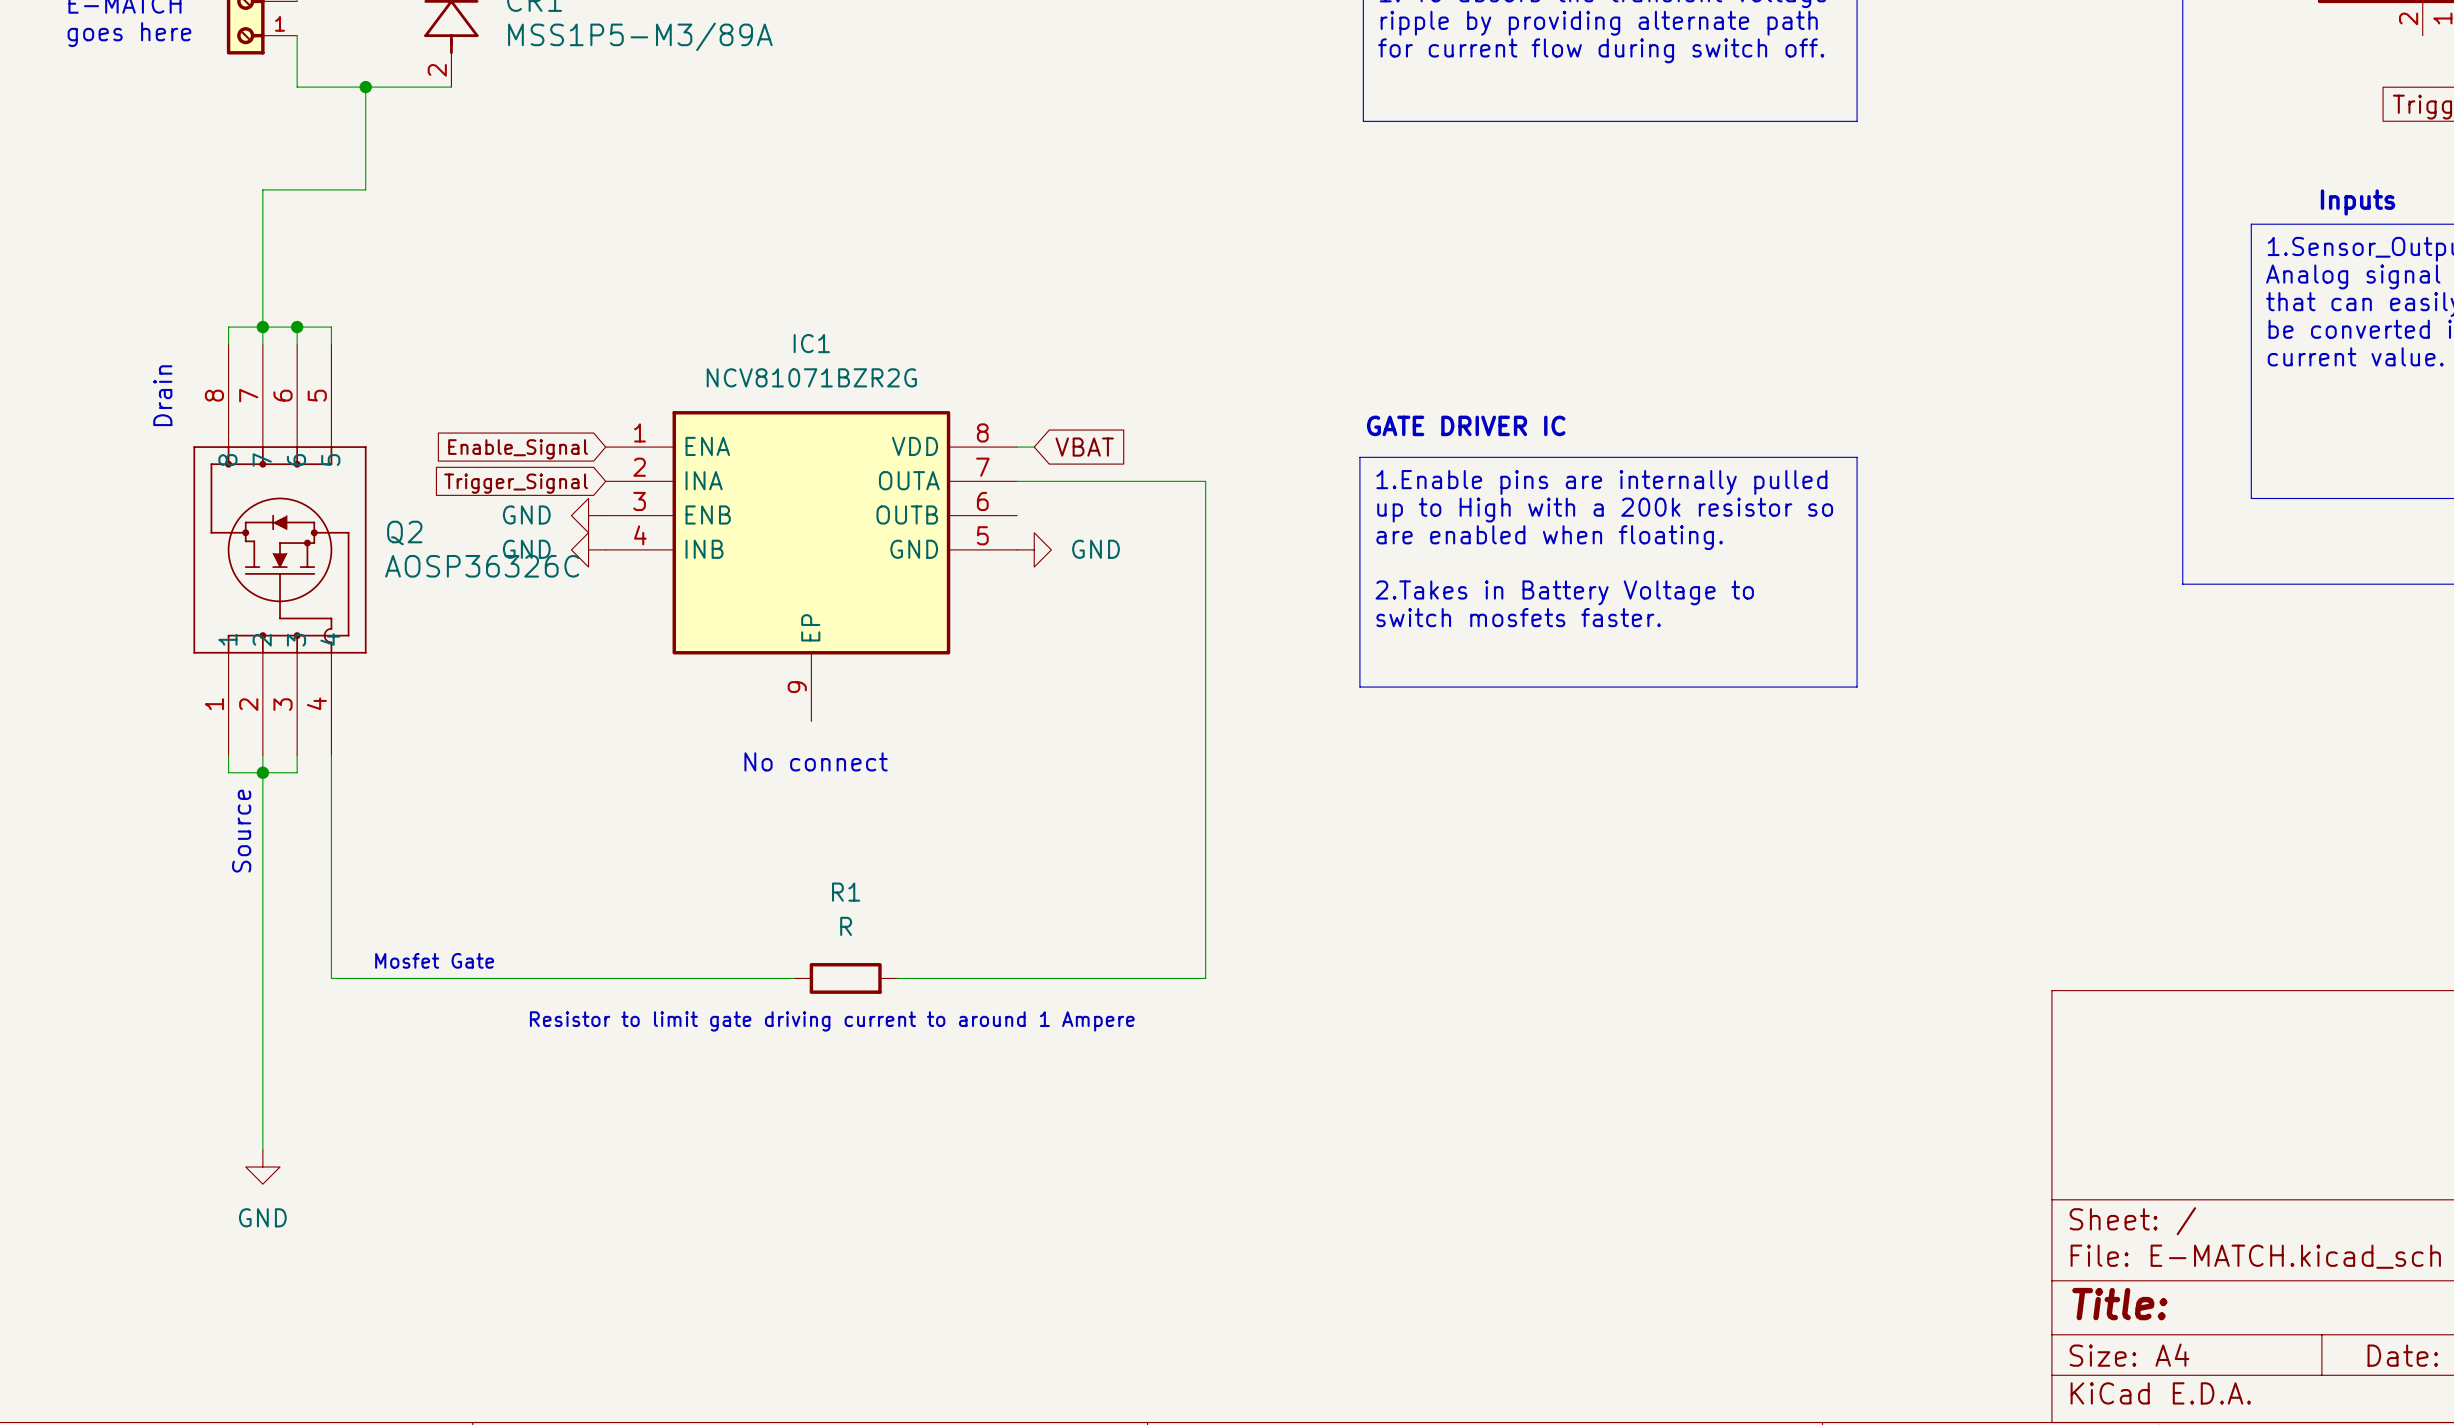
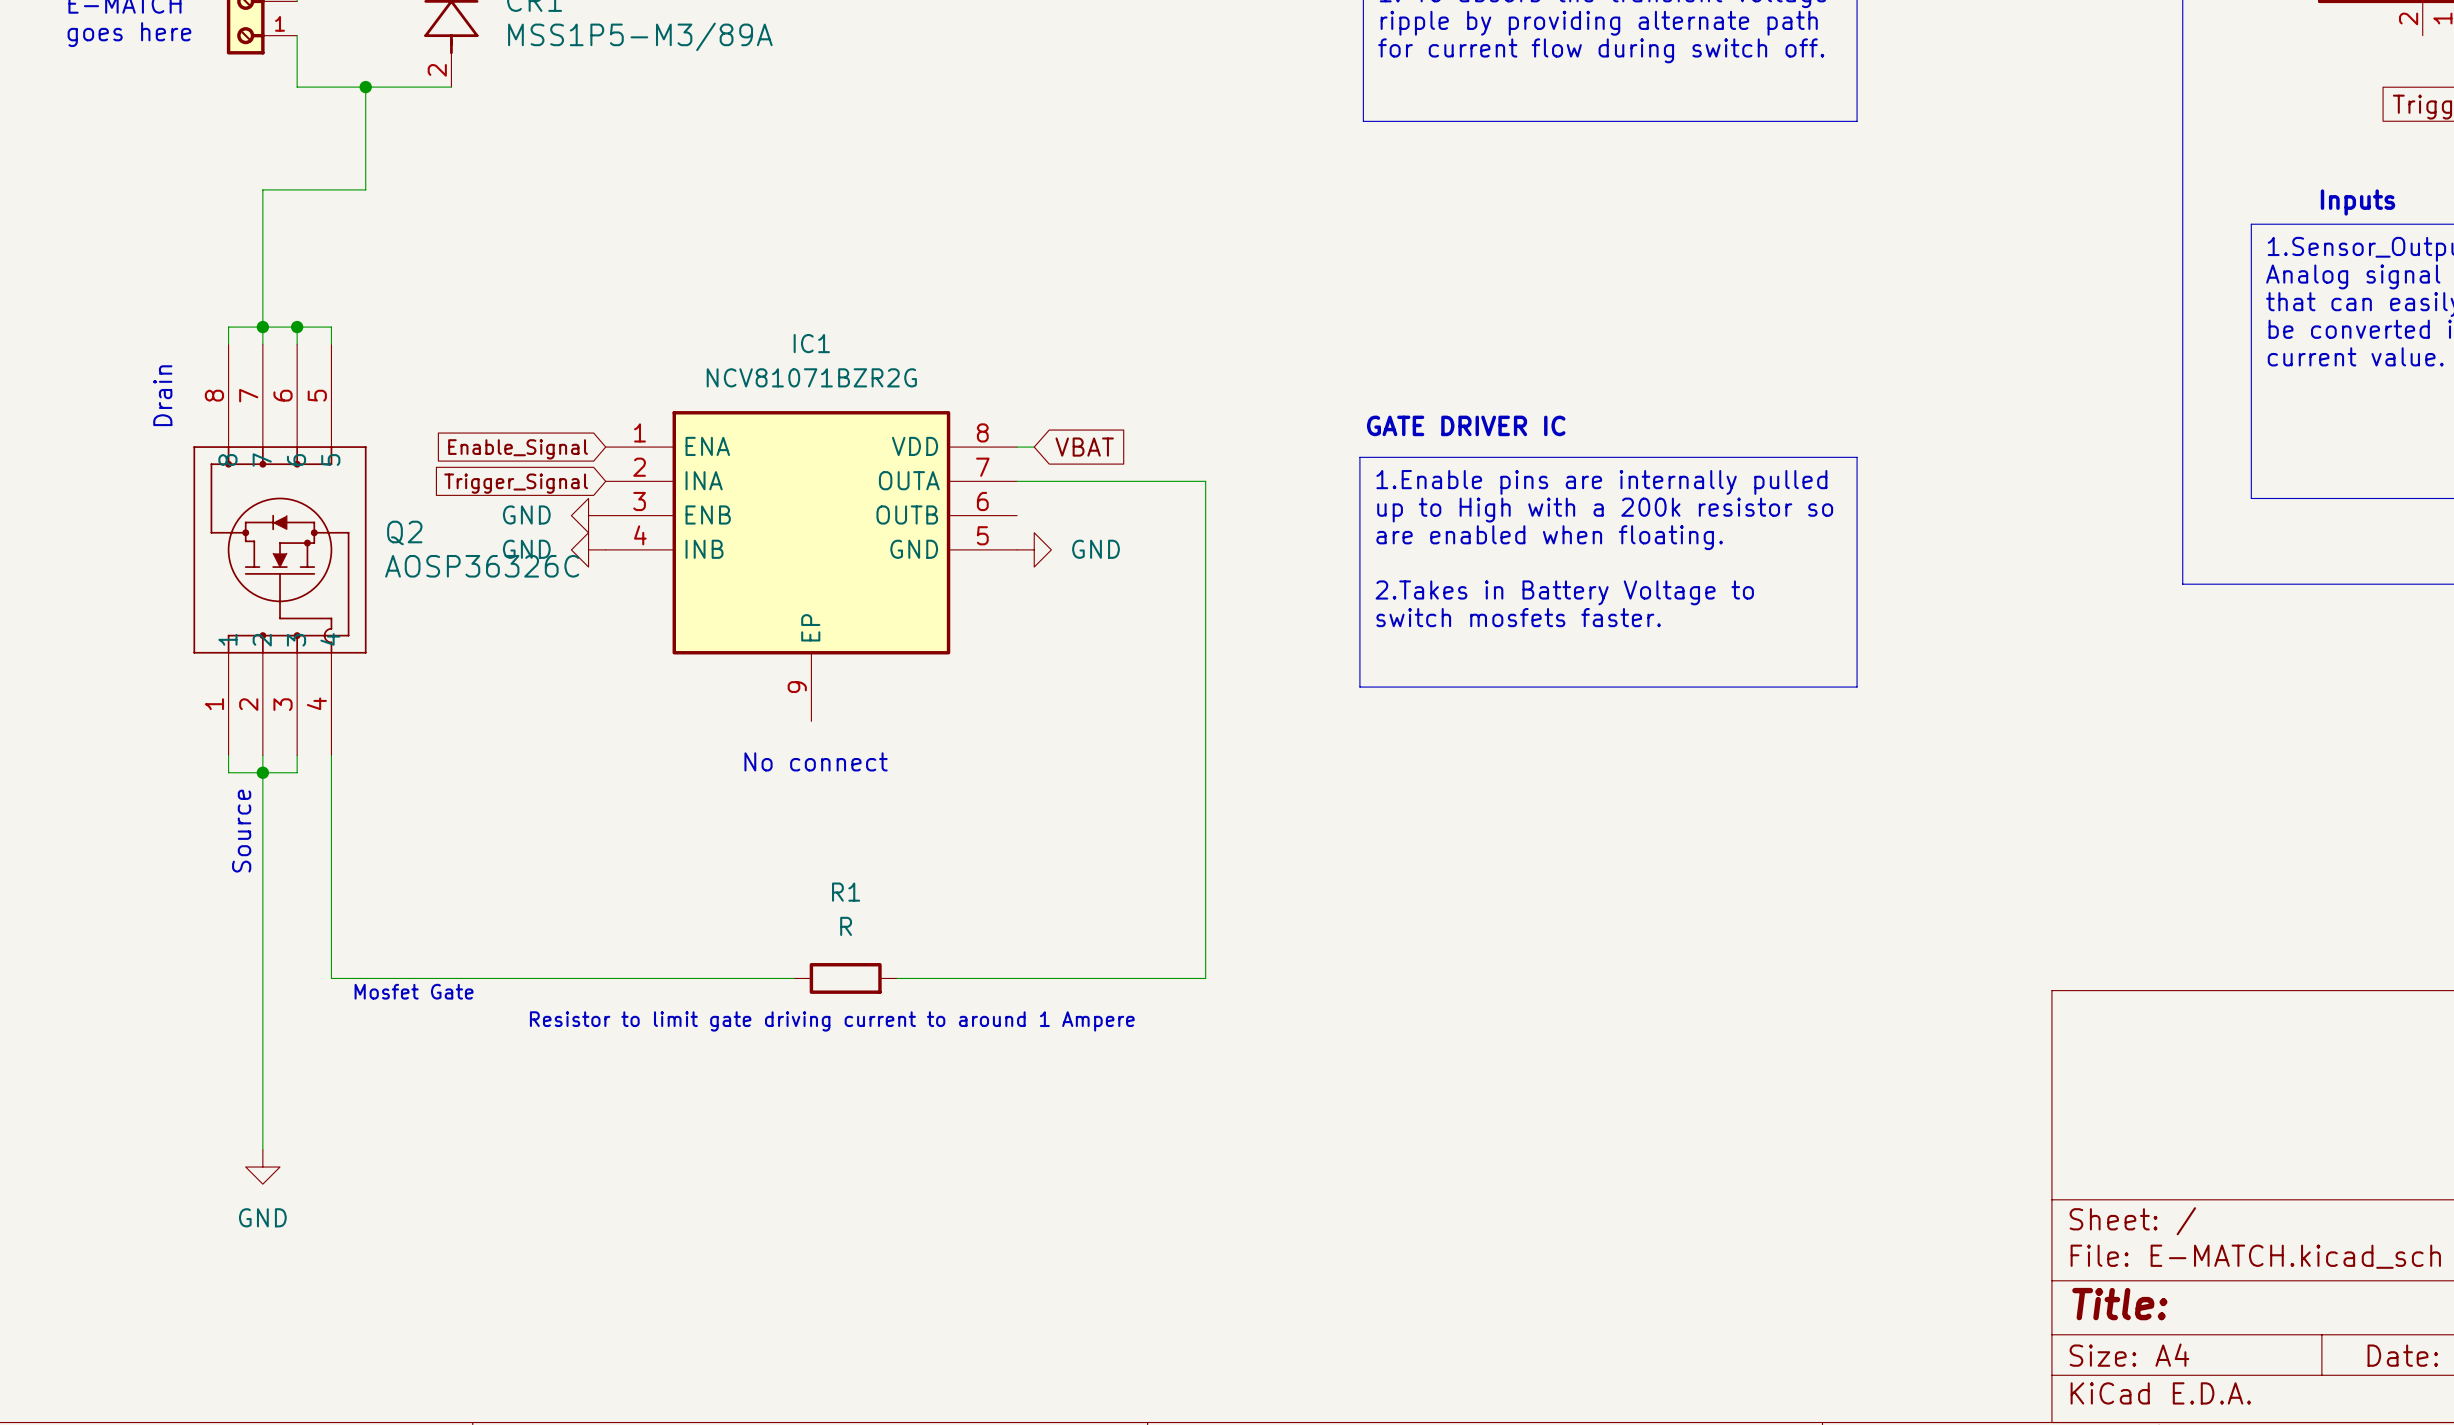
text position: Mosfet Gate (434, 960) -> Mosfet Gate (414, 991)

